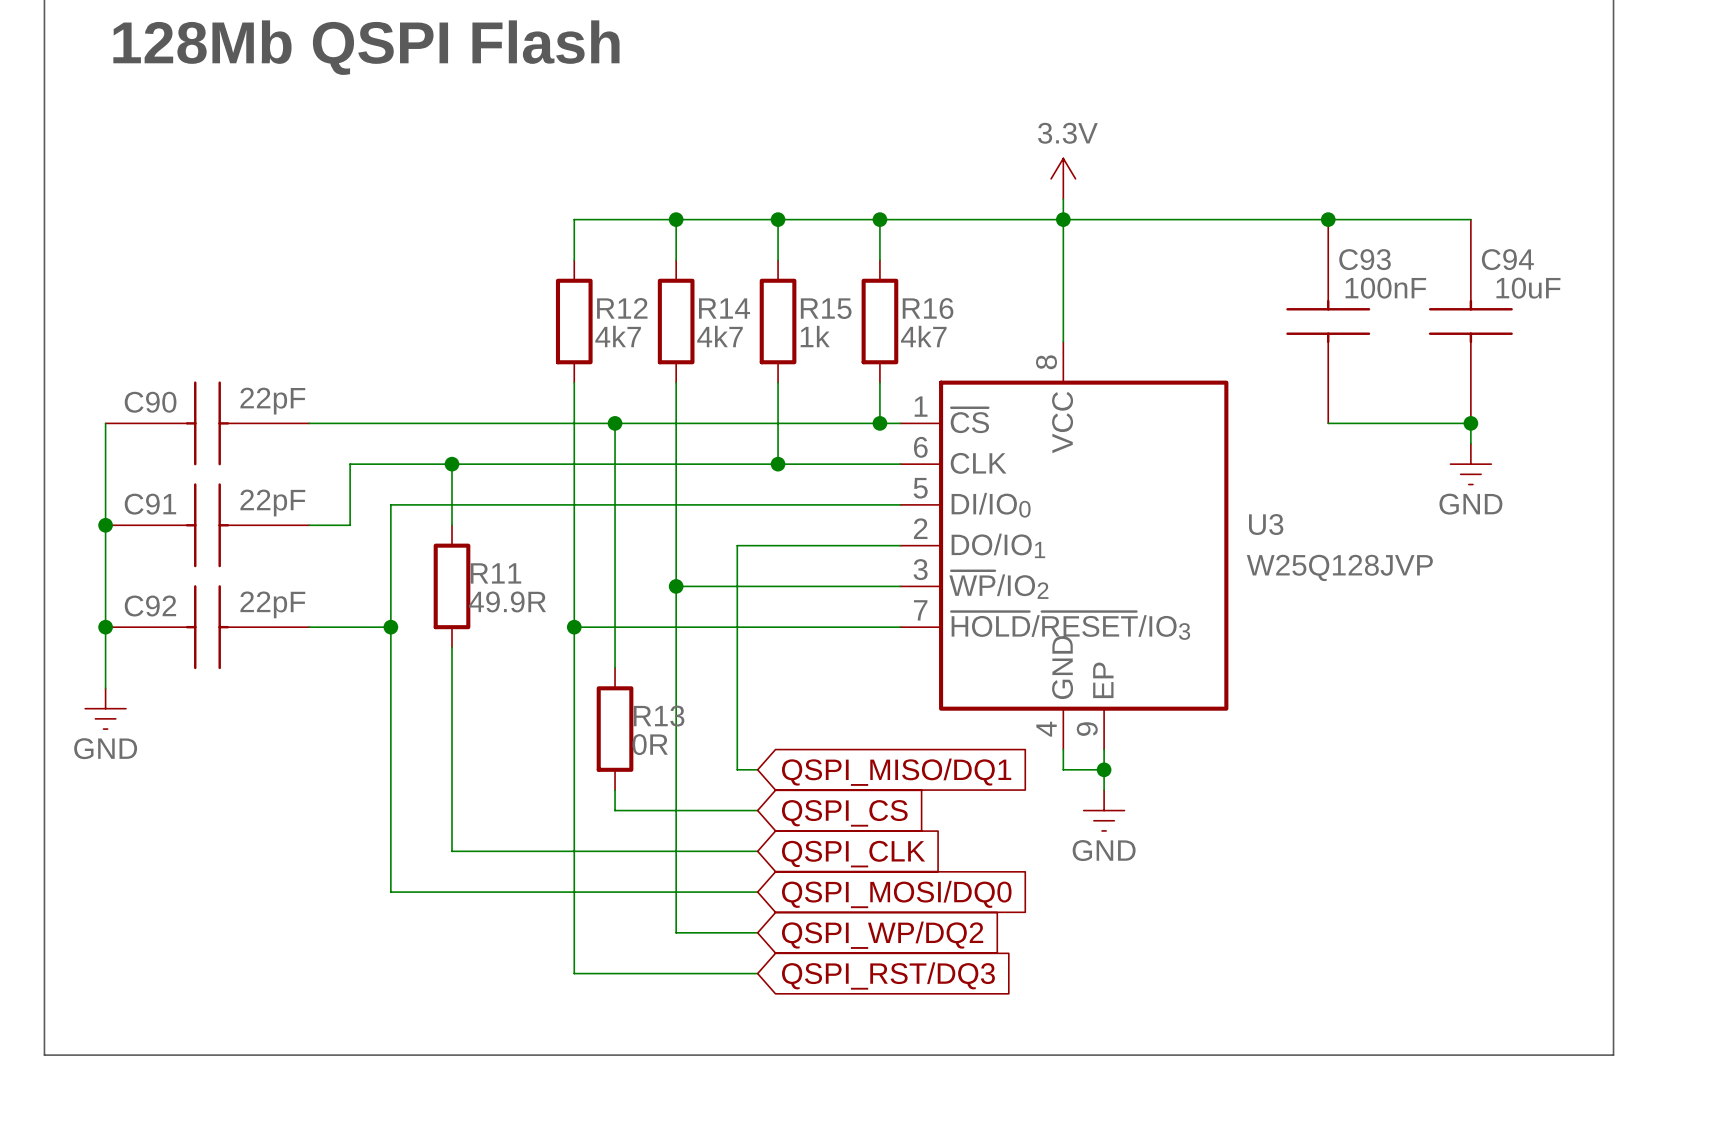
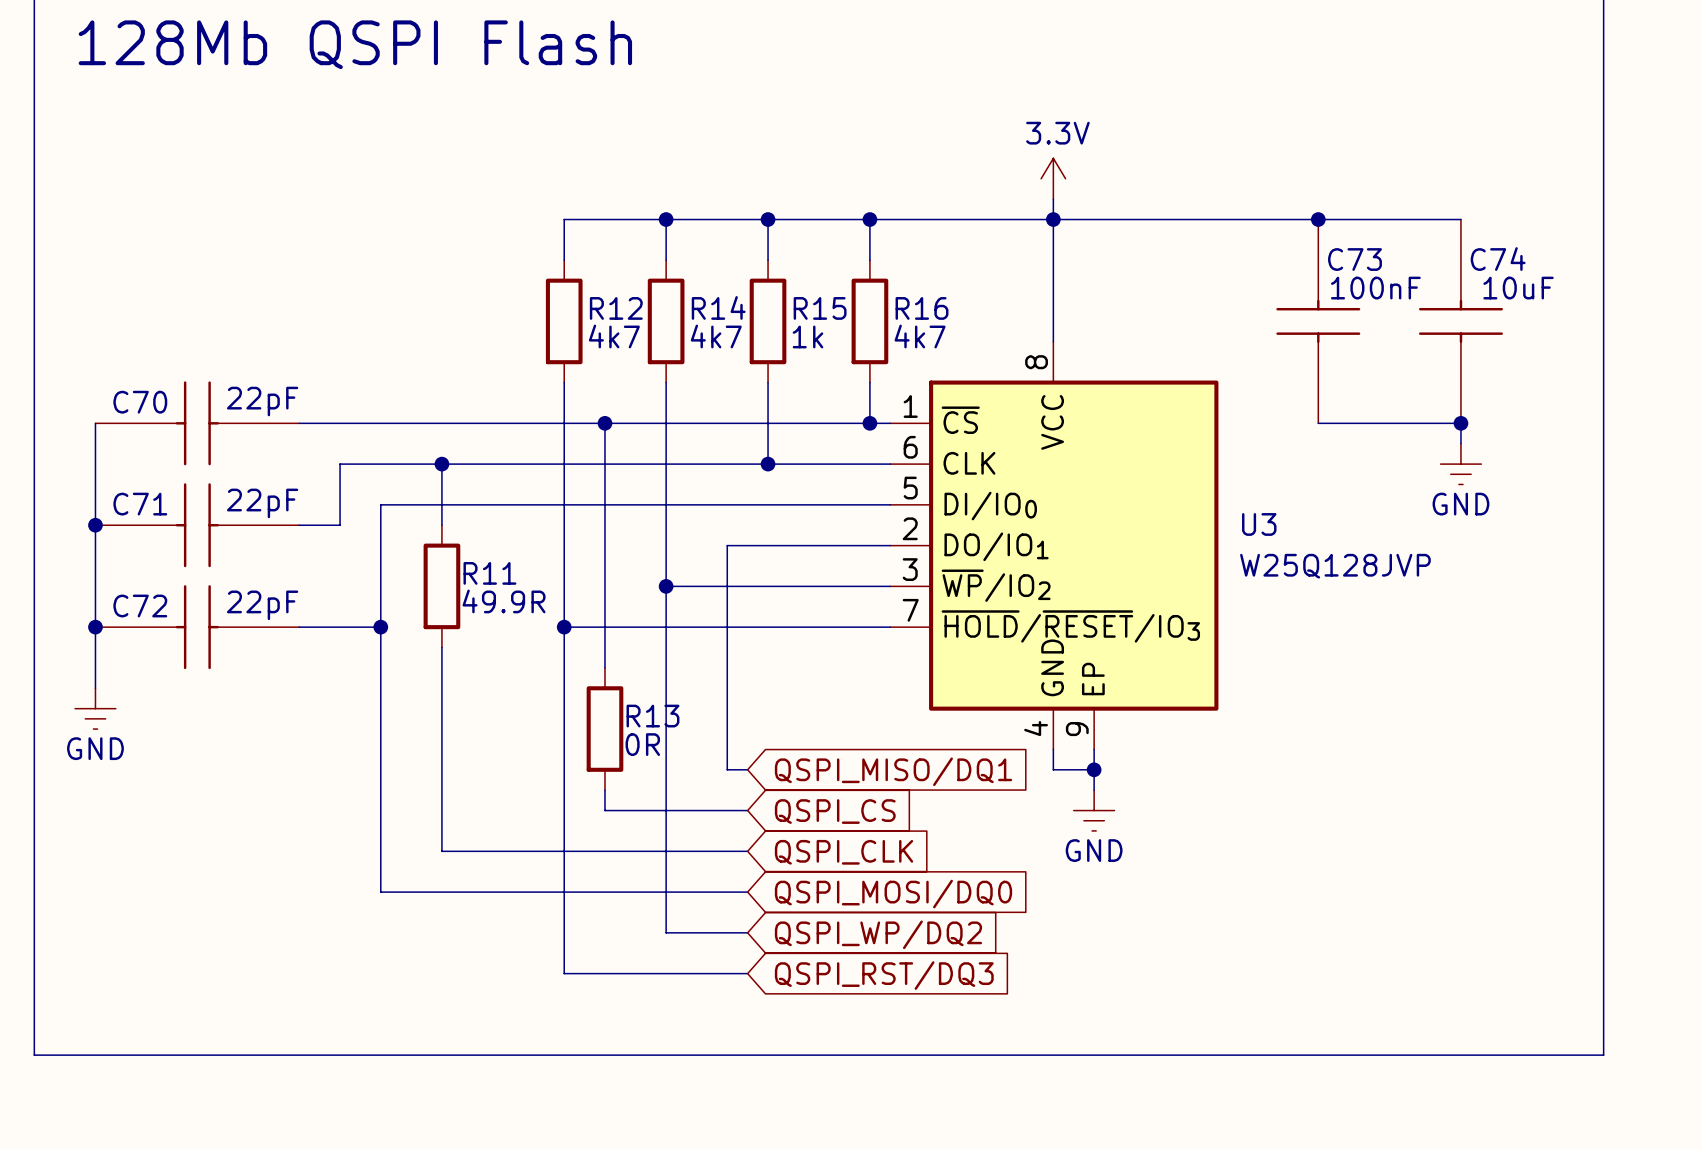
C93 name: C93 (1365, 259) -> C73 (1354, 259)
C94 name: C94 (1507, 259) -> C74 (1498, 259)
C90 name: C90 (150, 402) -> C70 (140, 402)
C91 name: C91 (150, 504) -> C71 (140, 504)
C92 name: C92 (150, 606) -> C72 (140, 606)

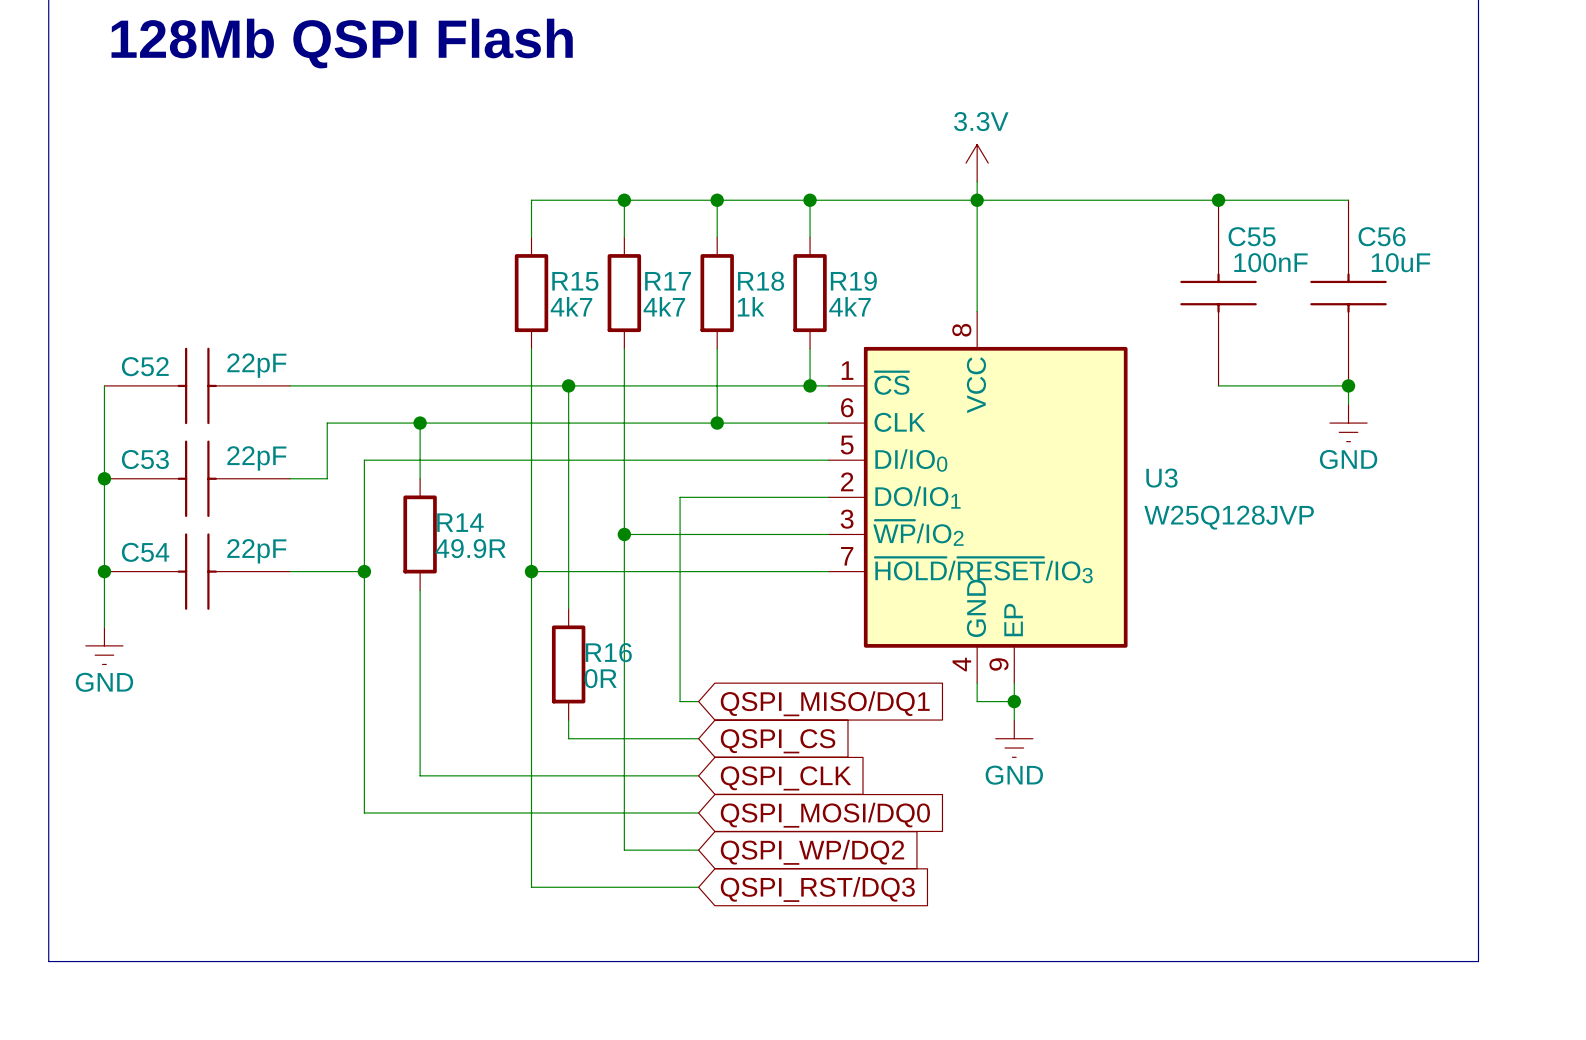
C73 name: C73 (1354, 259) -> C55 (1252, 236)
C74 name: C74 (1498, 259) -> C56 (1382, 236)
R14 name: R14 (718, 307) -> R17 (668, 281)
R12 name: R12 (616, 308) -> R15 (575, 281)
R15 name: R15 (820, 308) -> R18 (761, 281)
R16 name: R16 (922, 308) -> R19 (853, 281)
C70 name: C70 (140, 402) -> C52 (145, 366)
C71 name: C71 (140, 504) -> C53 (145, 459)
R11 name: R11 (489, 573) -> R14 (460, 522)
C72 name: C72 (140, 606) -> C54 (145, 552)
R13 name: R13 (652, 716) -> R16 (608, 652)

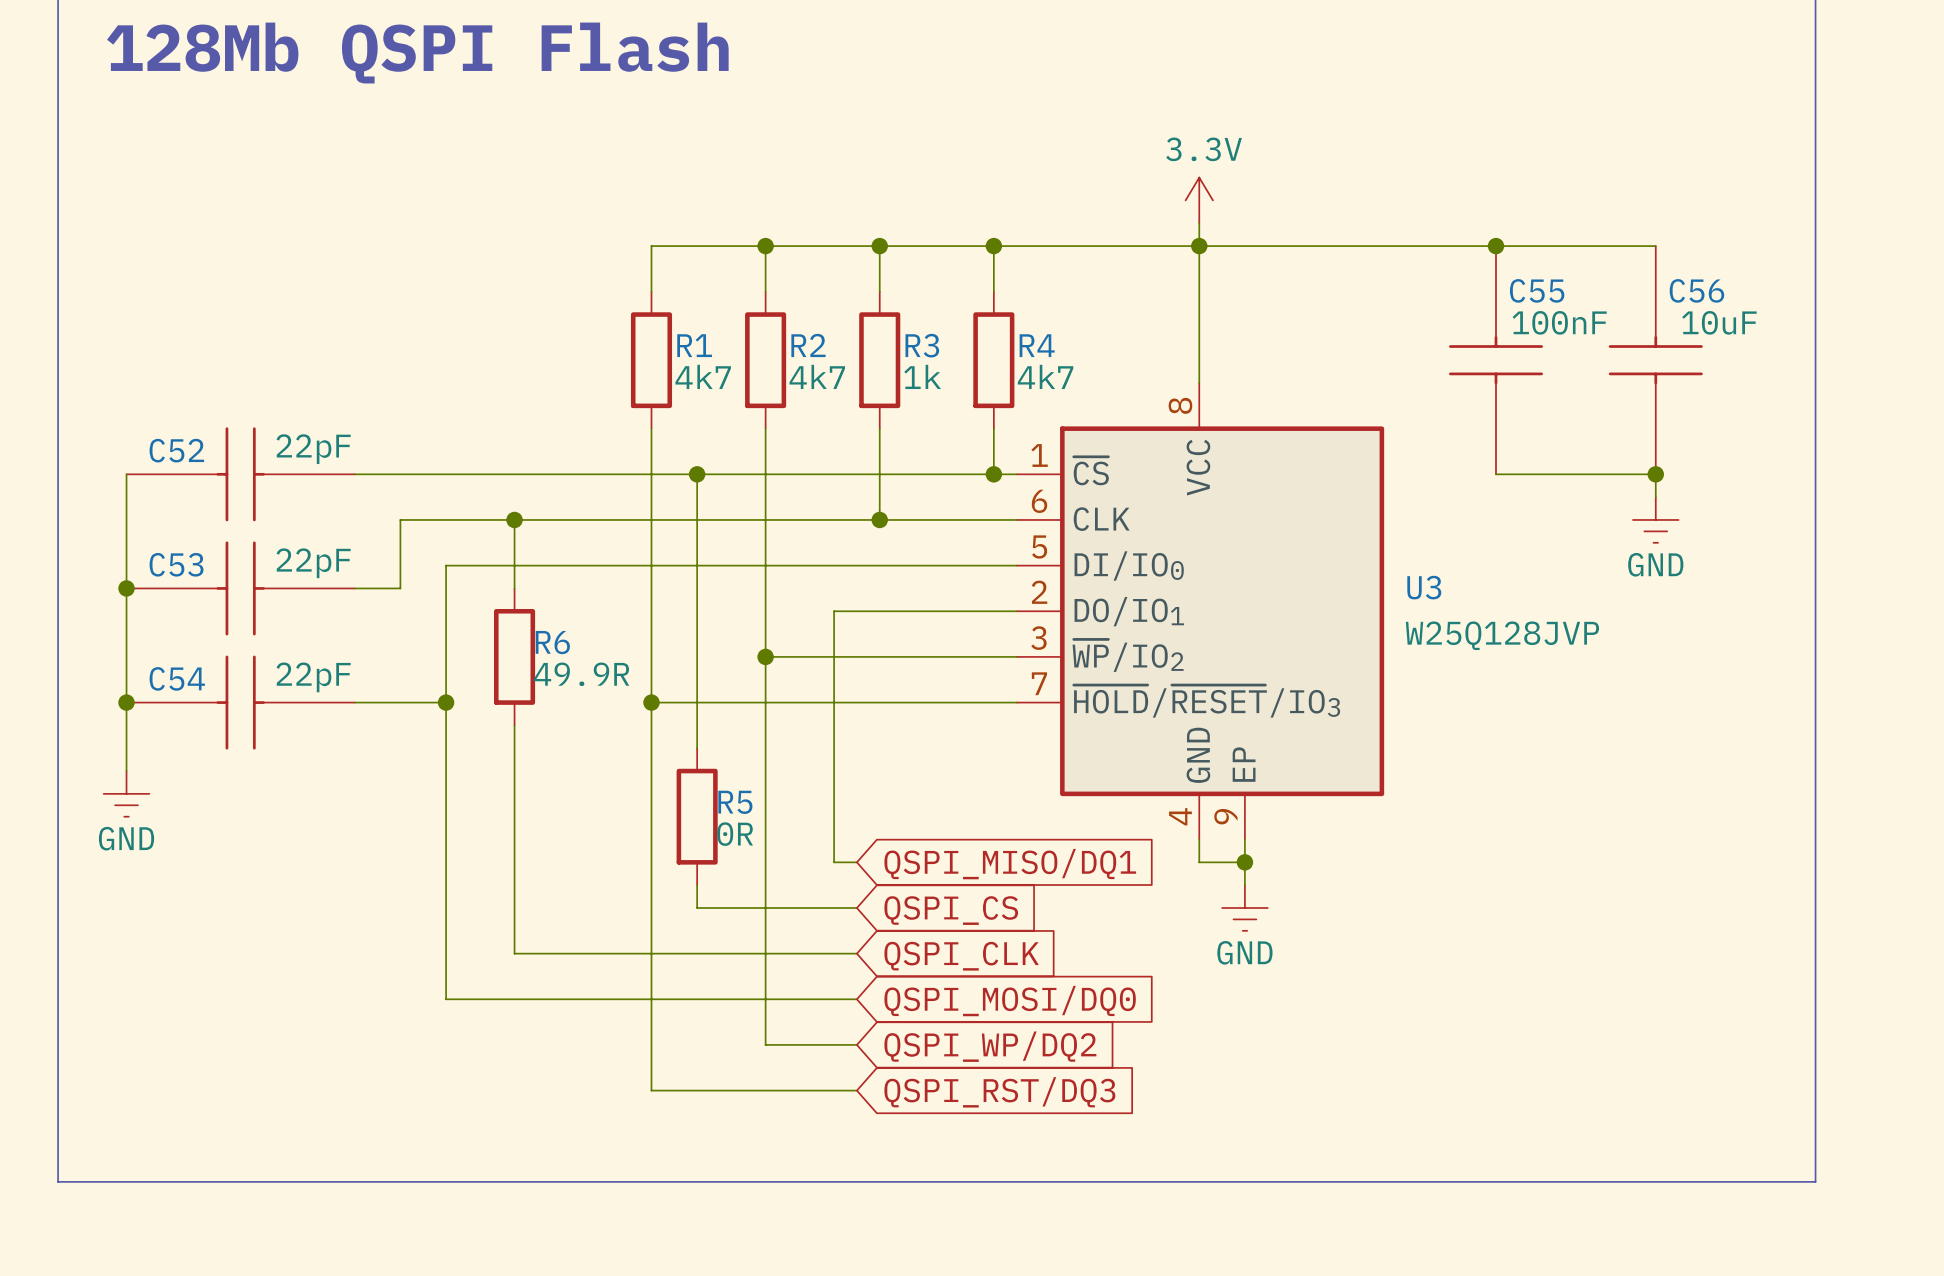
R15 name: R15 (575, 281) -> R1 (694, 345)
R17 name: R17 (668, 281) -> R2 (808, 345)
R18 name: R18 (761, 281) -> R3 (922, 345)
R19 name: R19 (853, 281) -> R4 (1037, 345)
R14 name: R14 (460, 522) -> R6 (552, 642)
R16 name: R16 (608, 652) -> R5 (735, 802)

